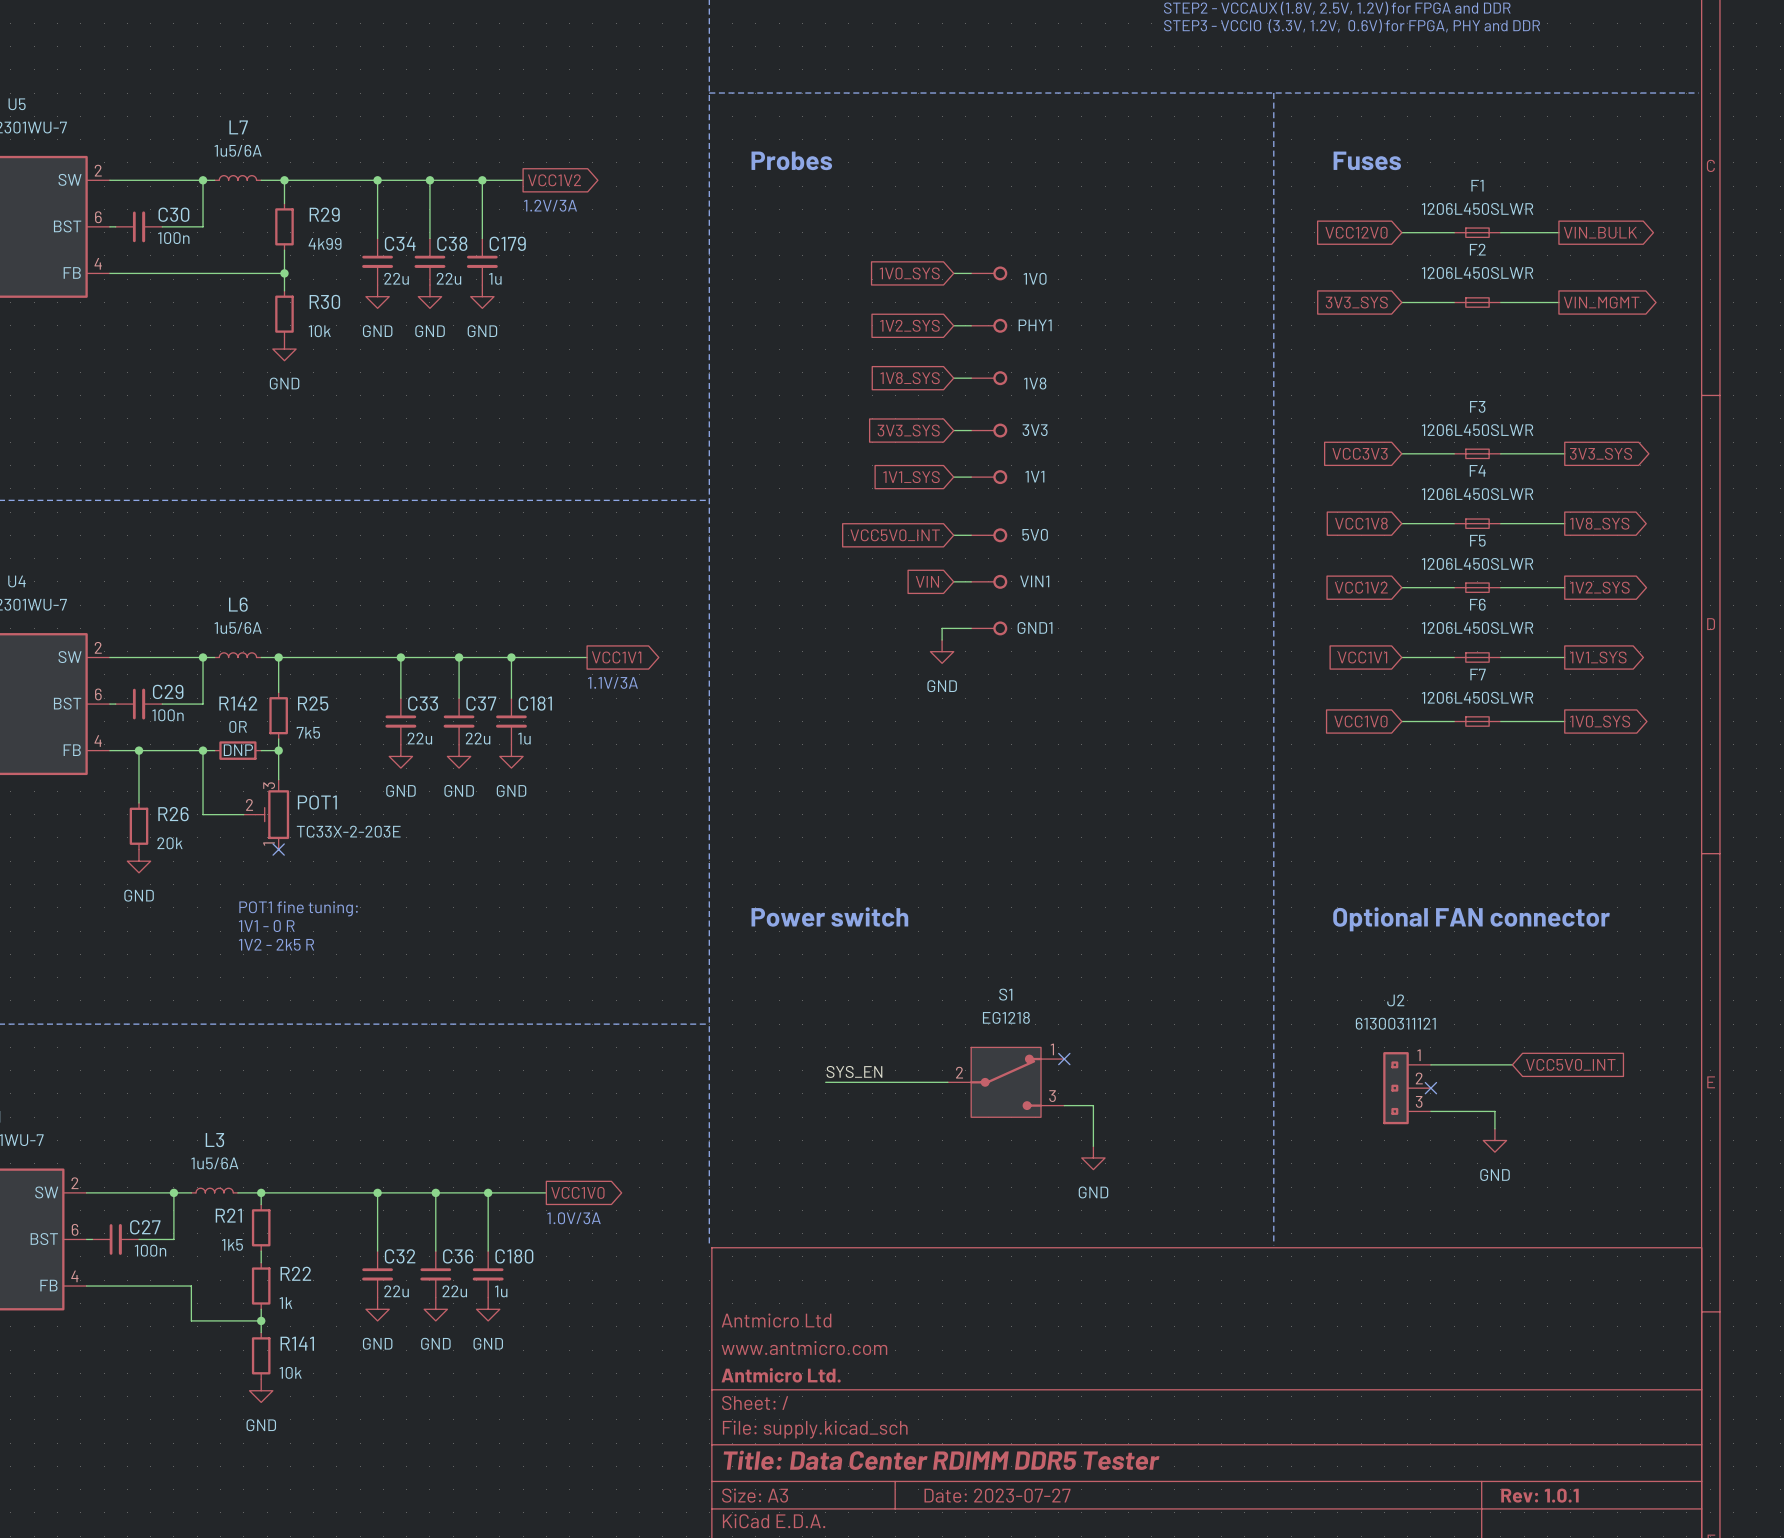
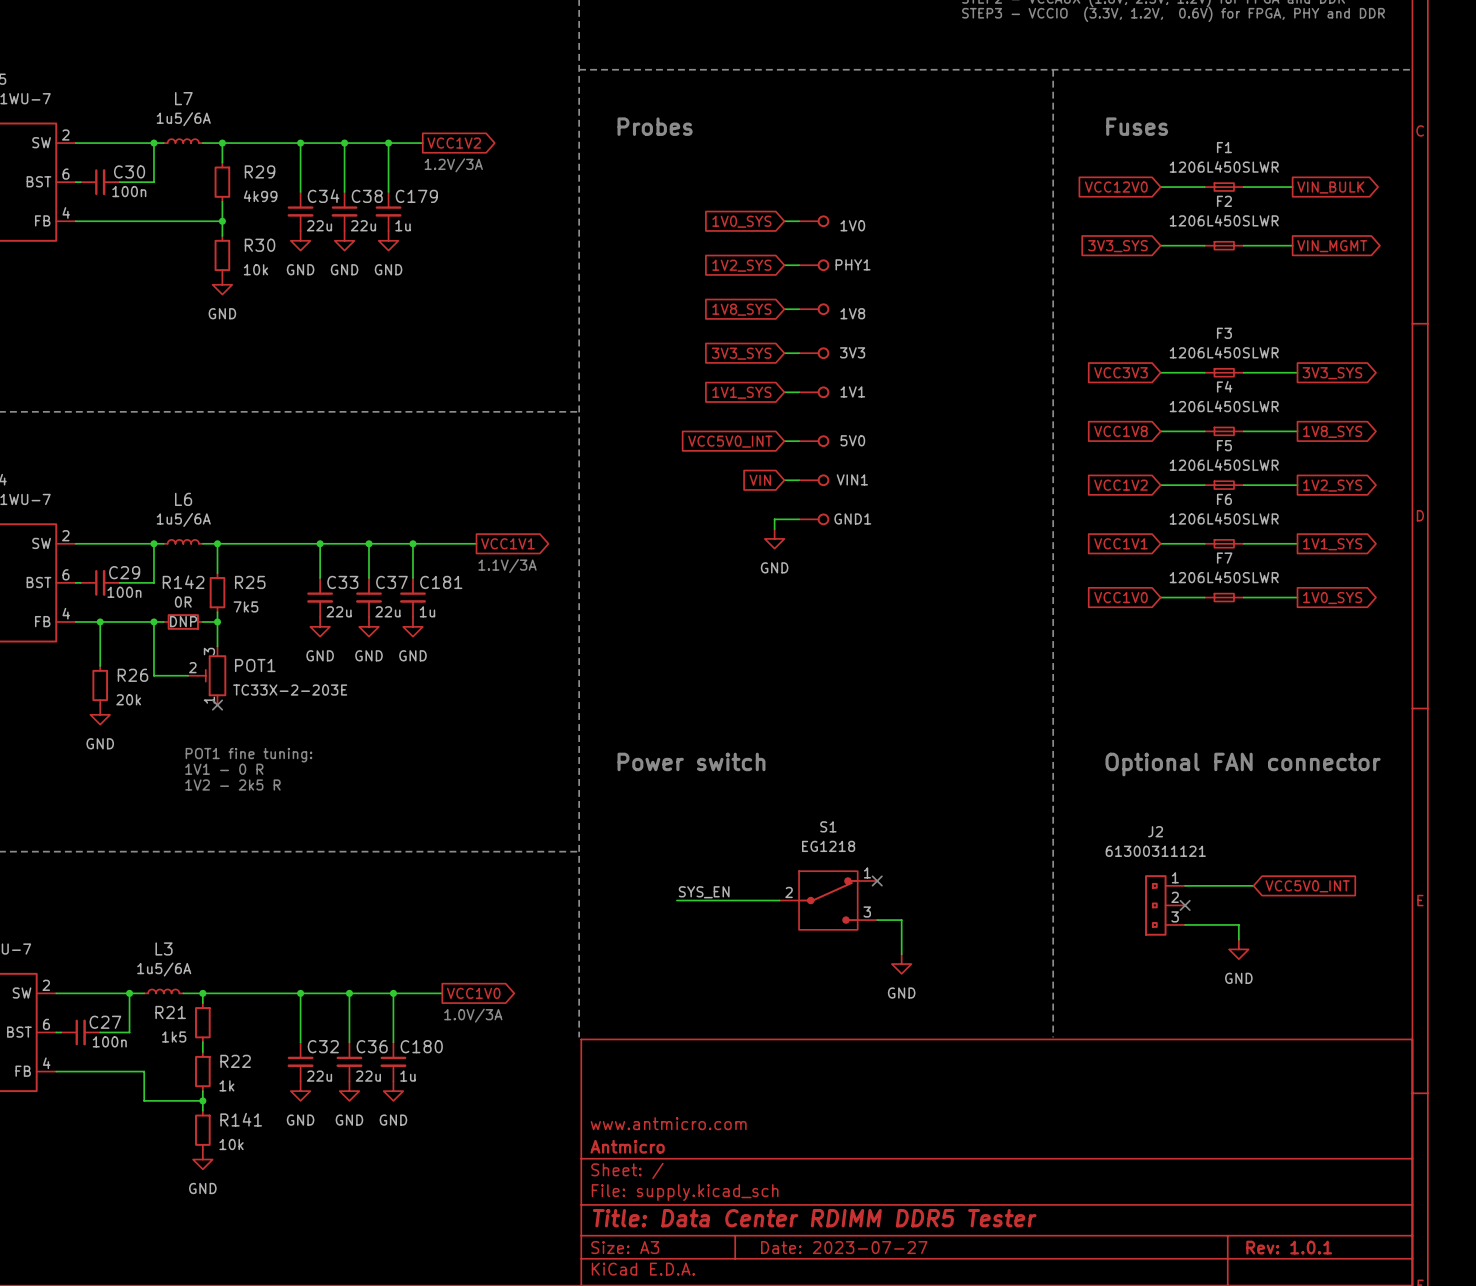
title block: Antmicro Ltd (776, 1320) -> none
title block: Antmicro Ltd. (781, 1375) -> Antmicro (627, 1146)

